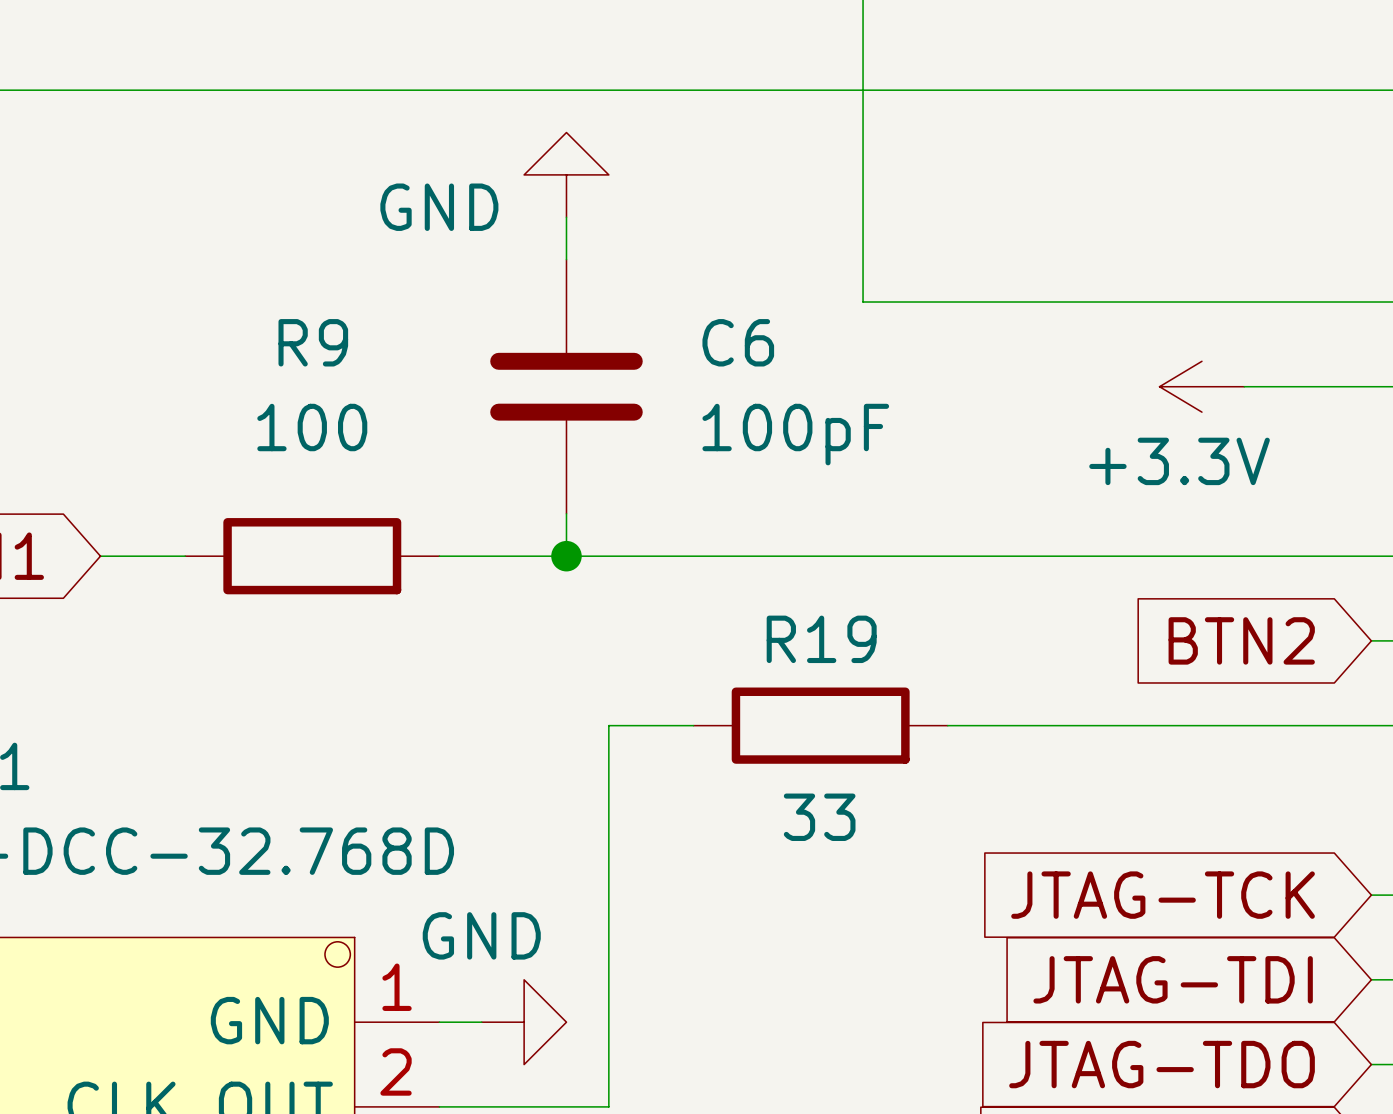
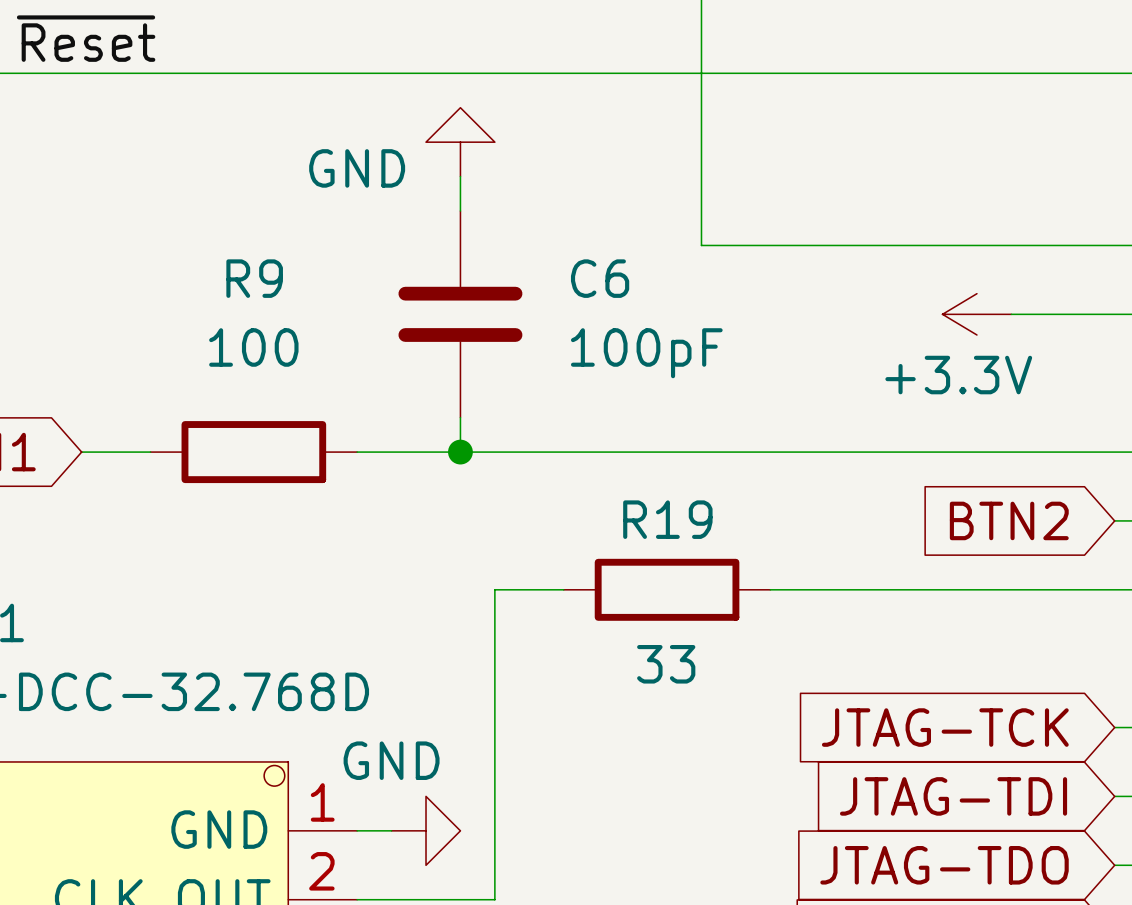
label: none -> ~{Reset} (86, 38)

